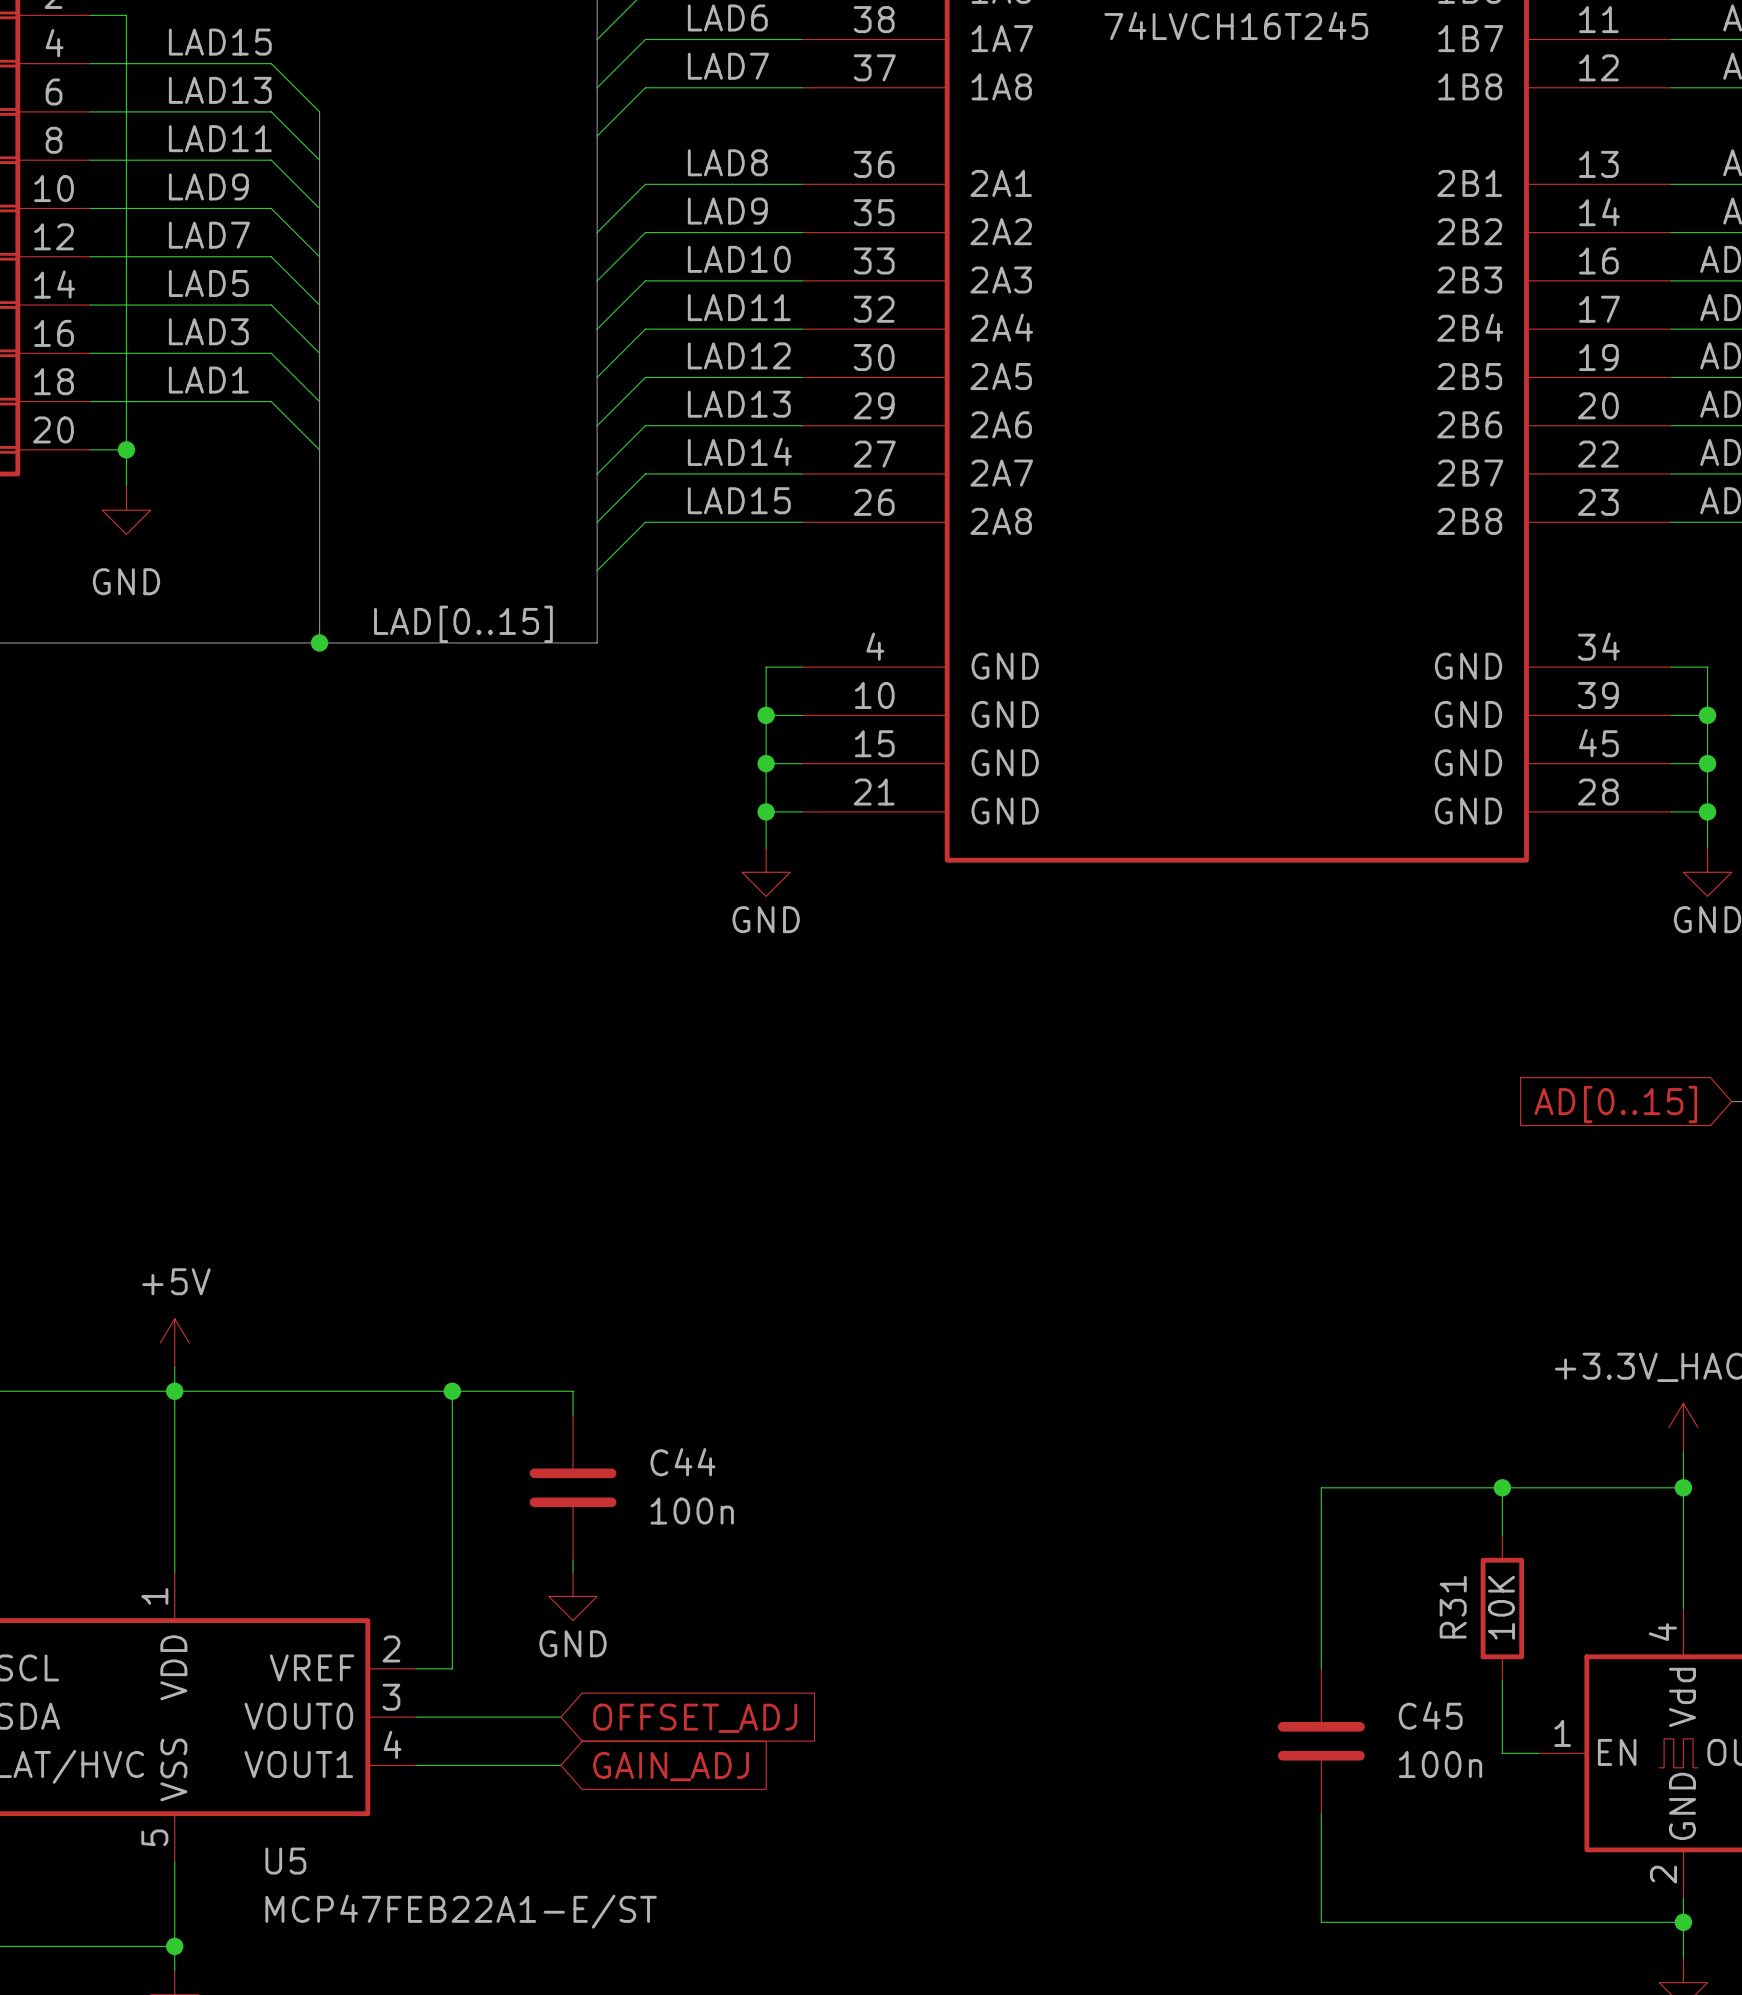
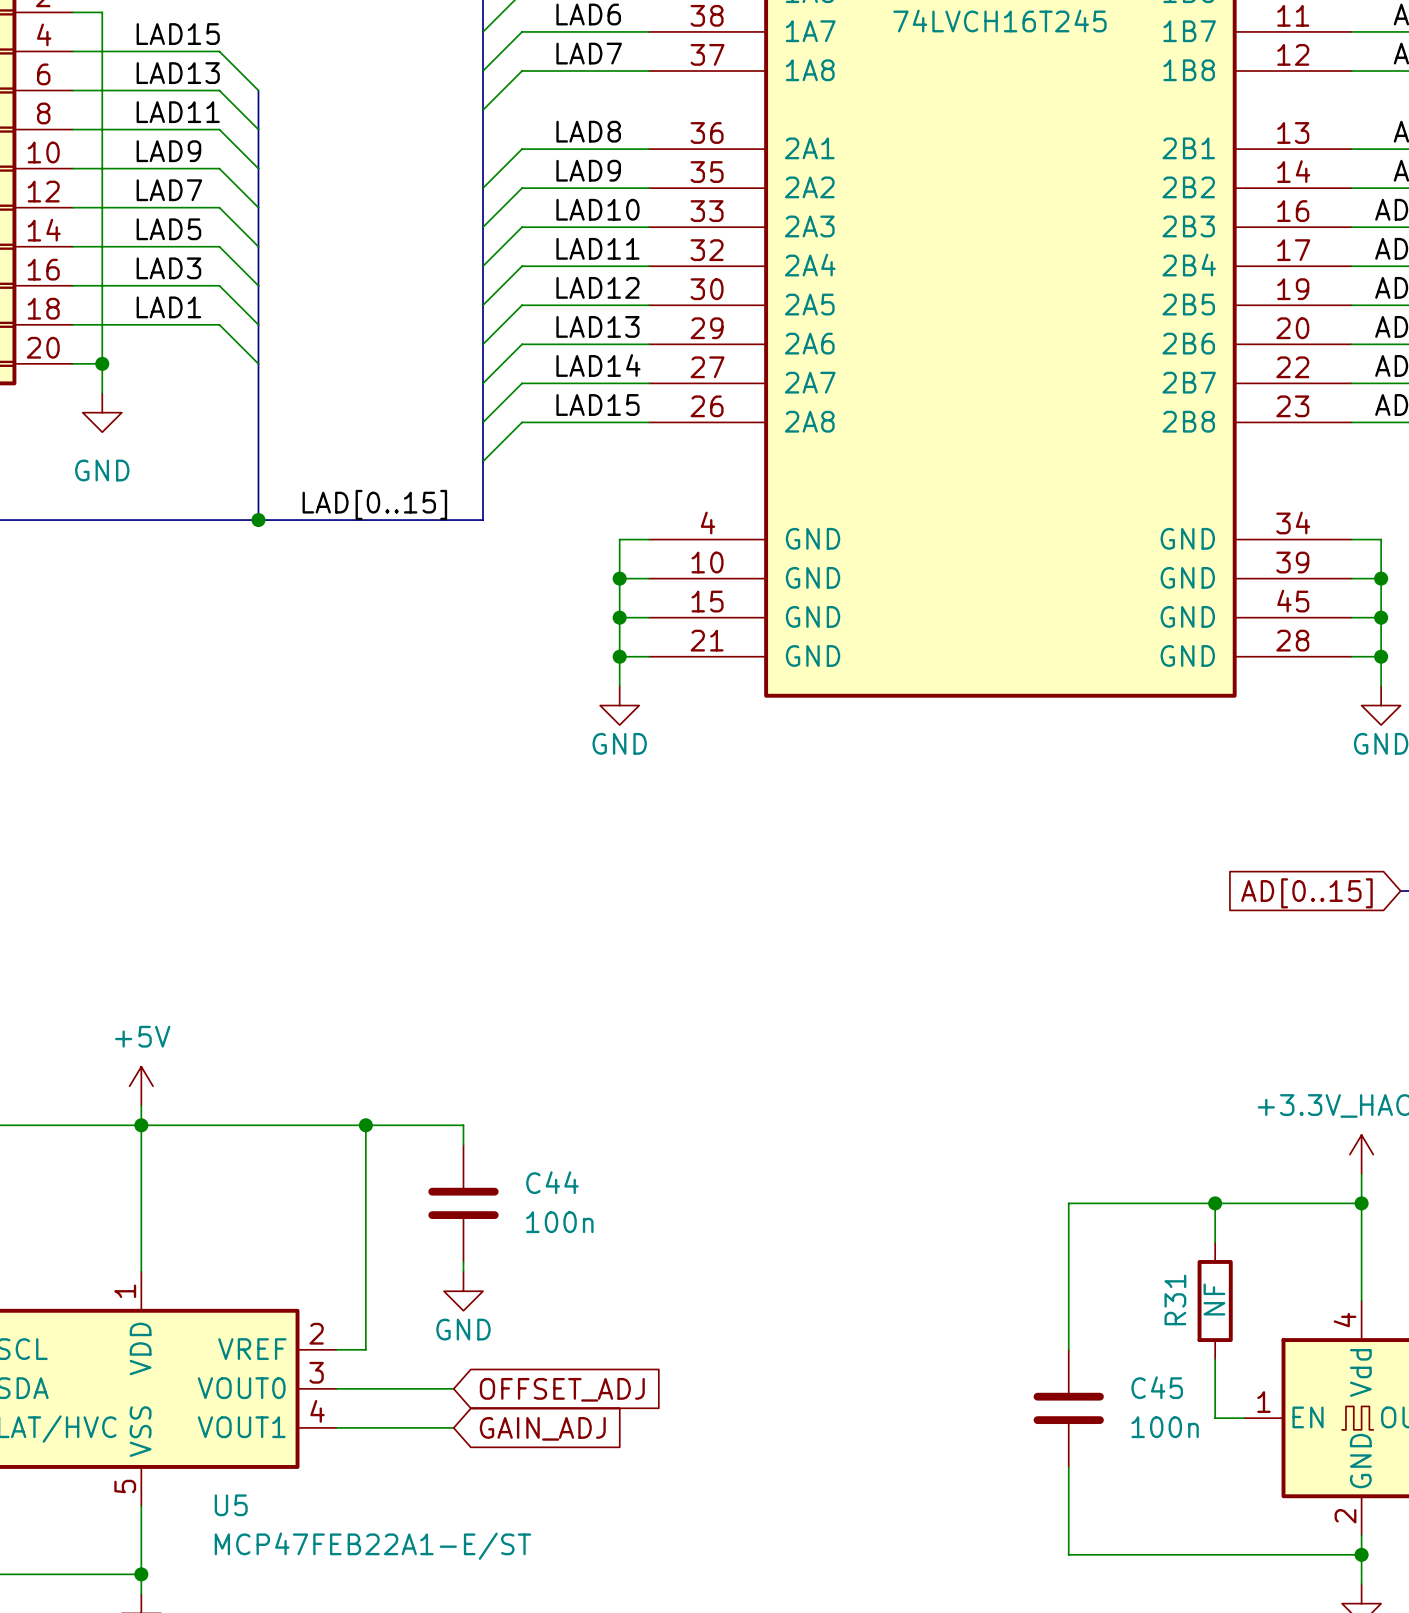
R31 value: 10K (1501, 1607) -> NF (1214, 1299)

